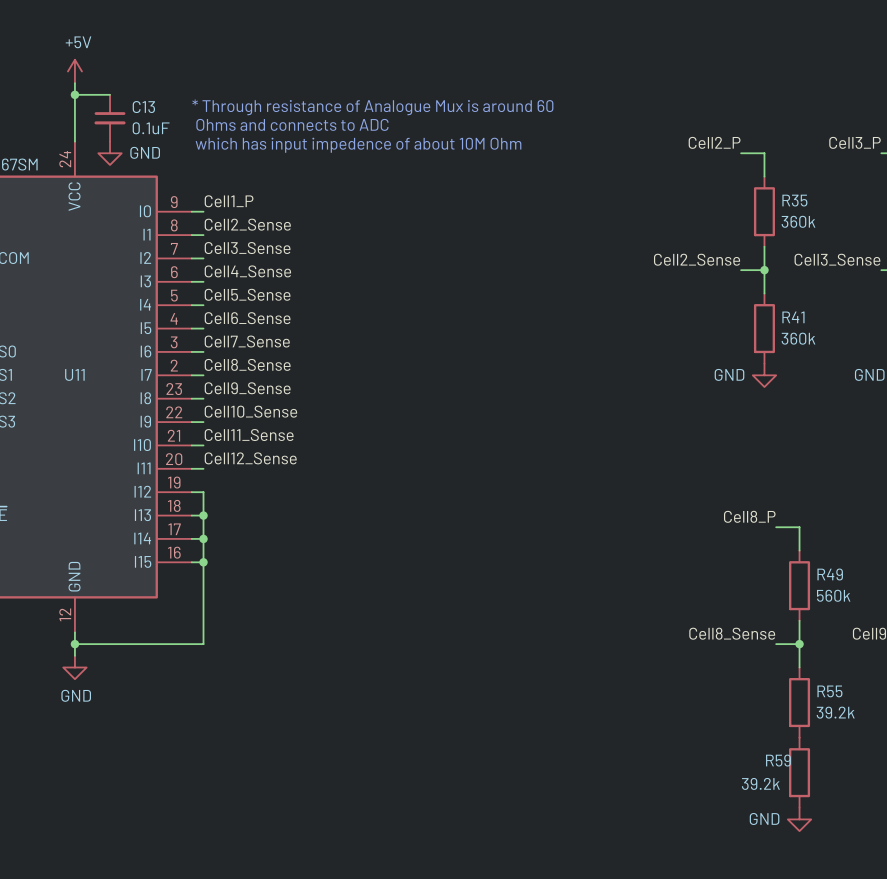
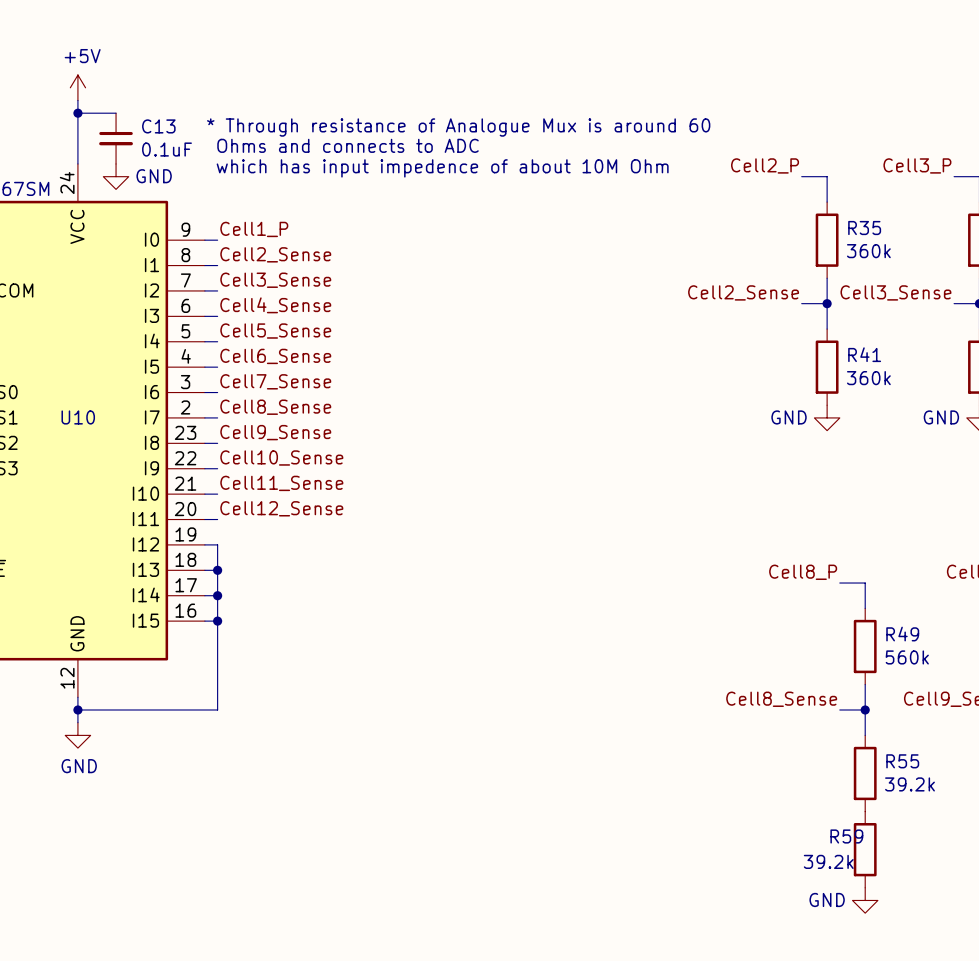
U11 name: U11 (74, 374) -> U10 (78, 417)

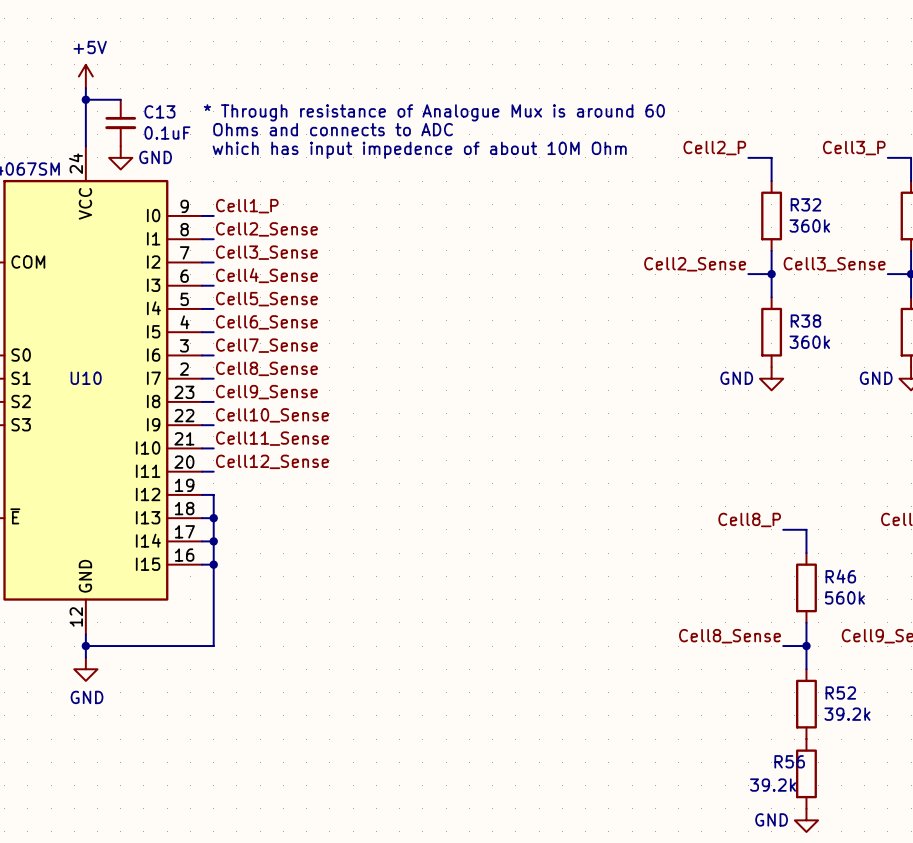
R35 name: R35 (864, 228) -> R32 (805, 204)
R41 name: R41 (864, 354) -> R38 (805, 321)
R49 name: R49 (902, 634) -> R46 (840, 576)
R55 name: R55 (902, 761) -> R52 (840, 693)
R59 name: R59 (846, 836) -> R56 (789, 761)

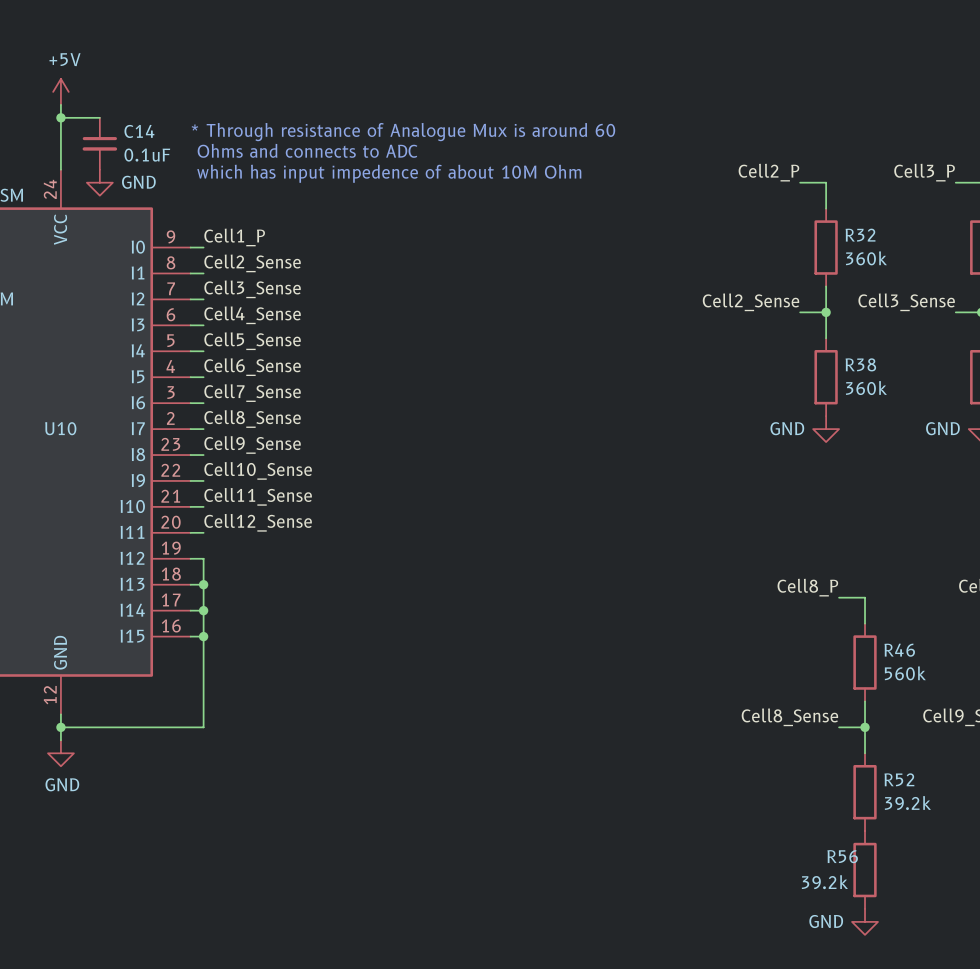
C13 name: C13 (159, 111) -> C14 (139, 131)

